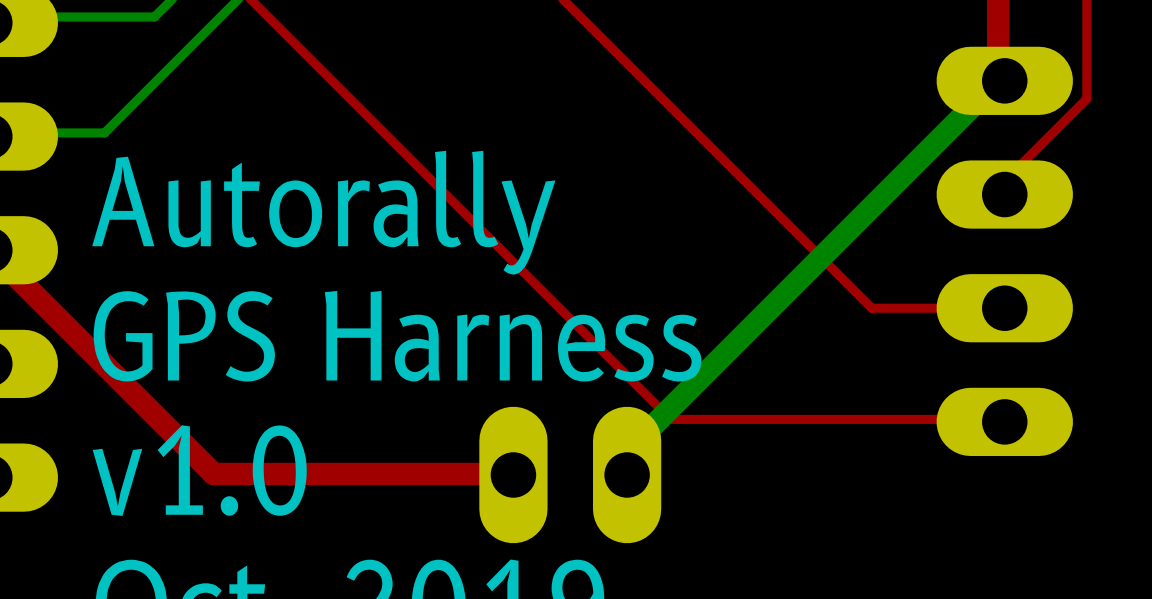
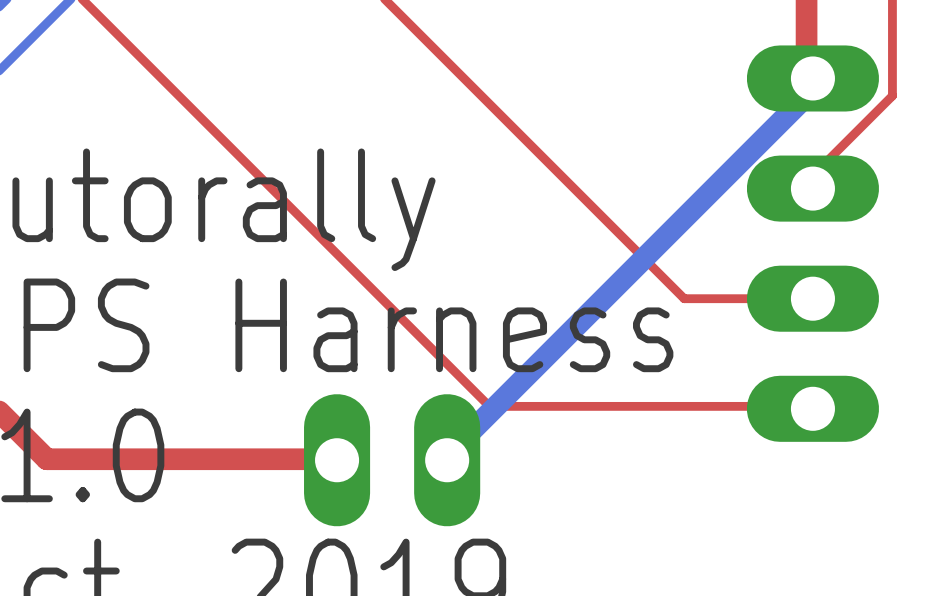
bottom track: (1004, 80) (997, 80) (608, 470) (623, 473) -> (859, 62) (859, 78) (812, 78) (806, 82) (806, 95) (443, 459)

